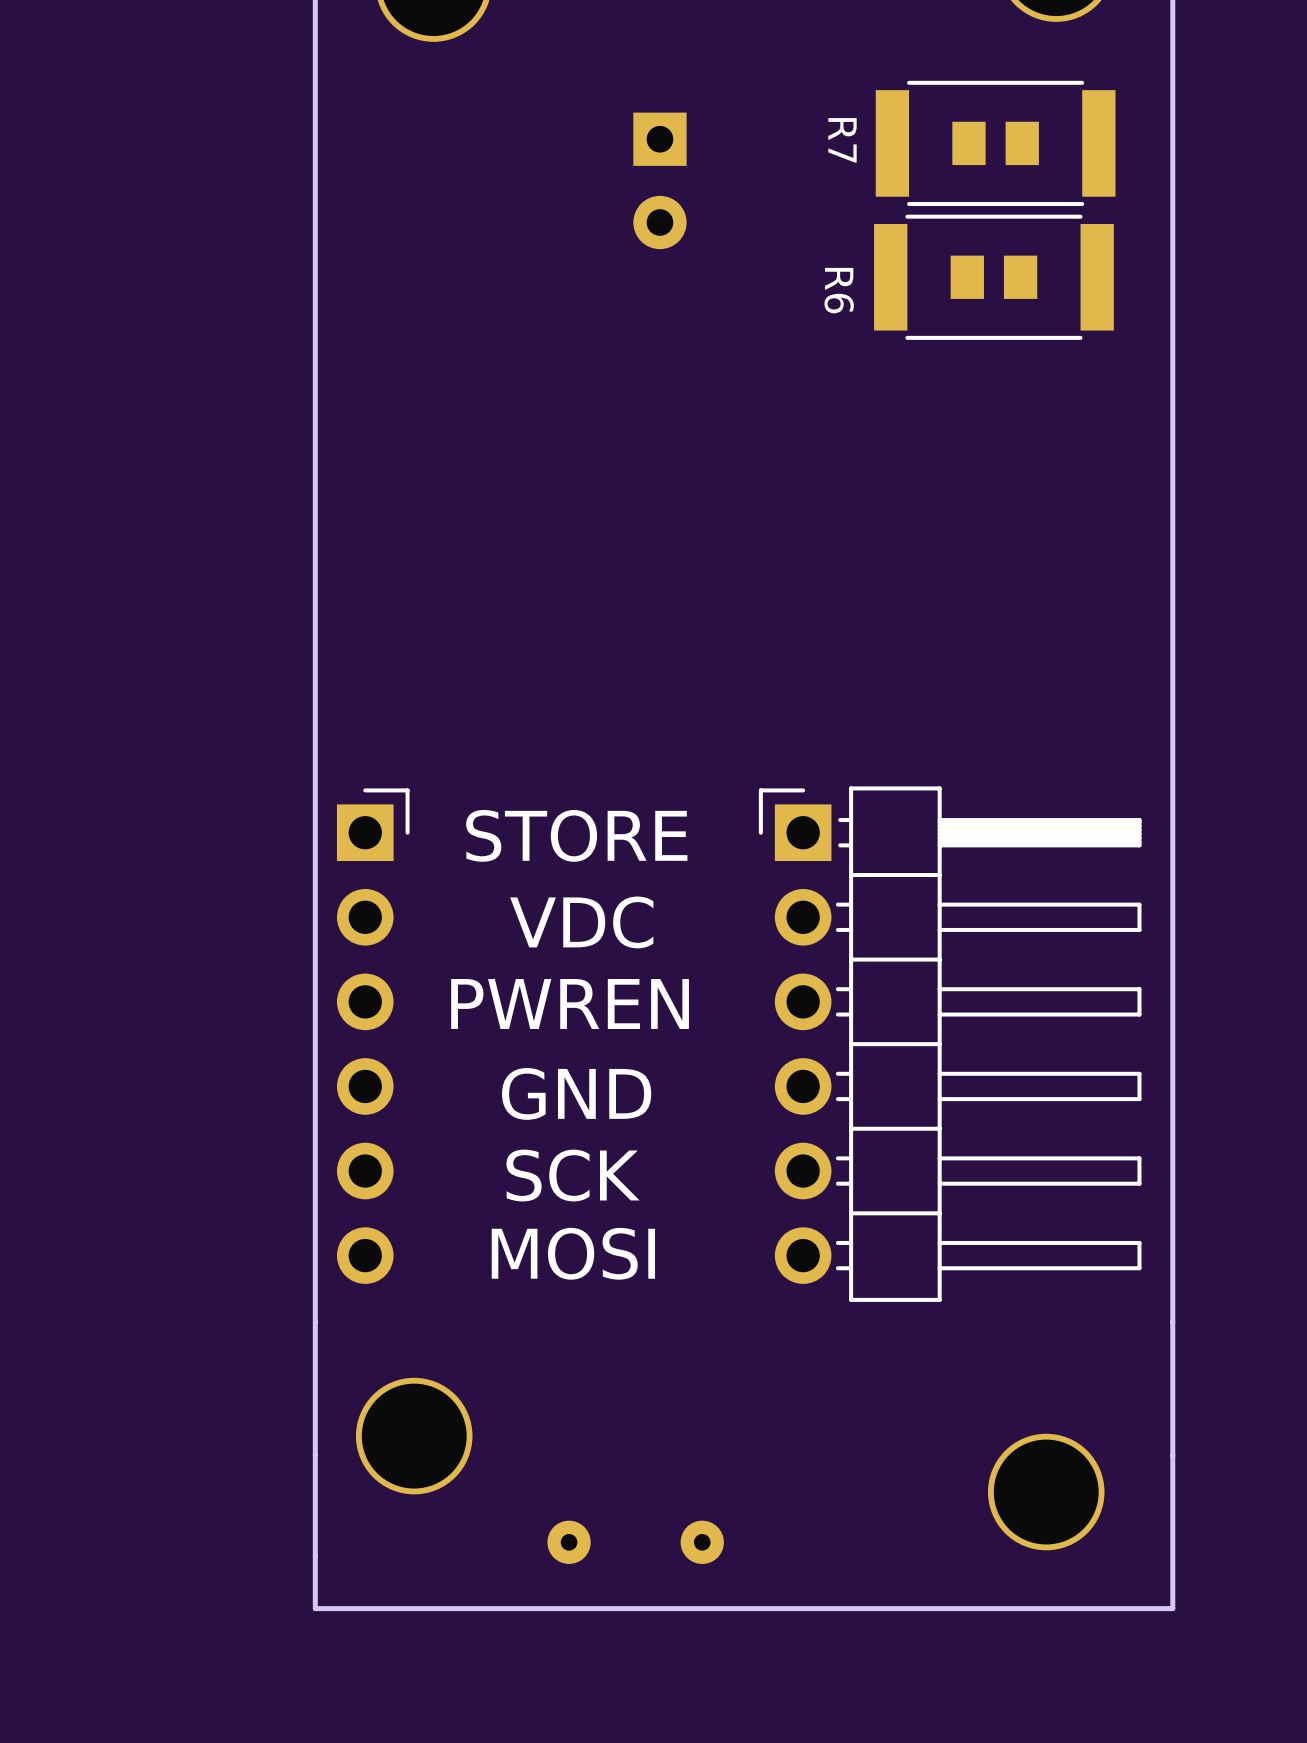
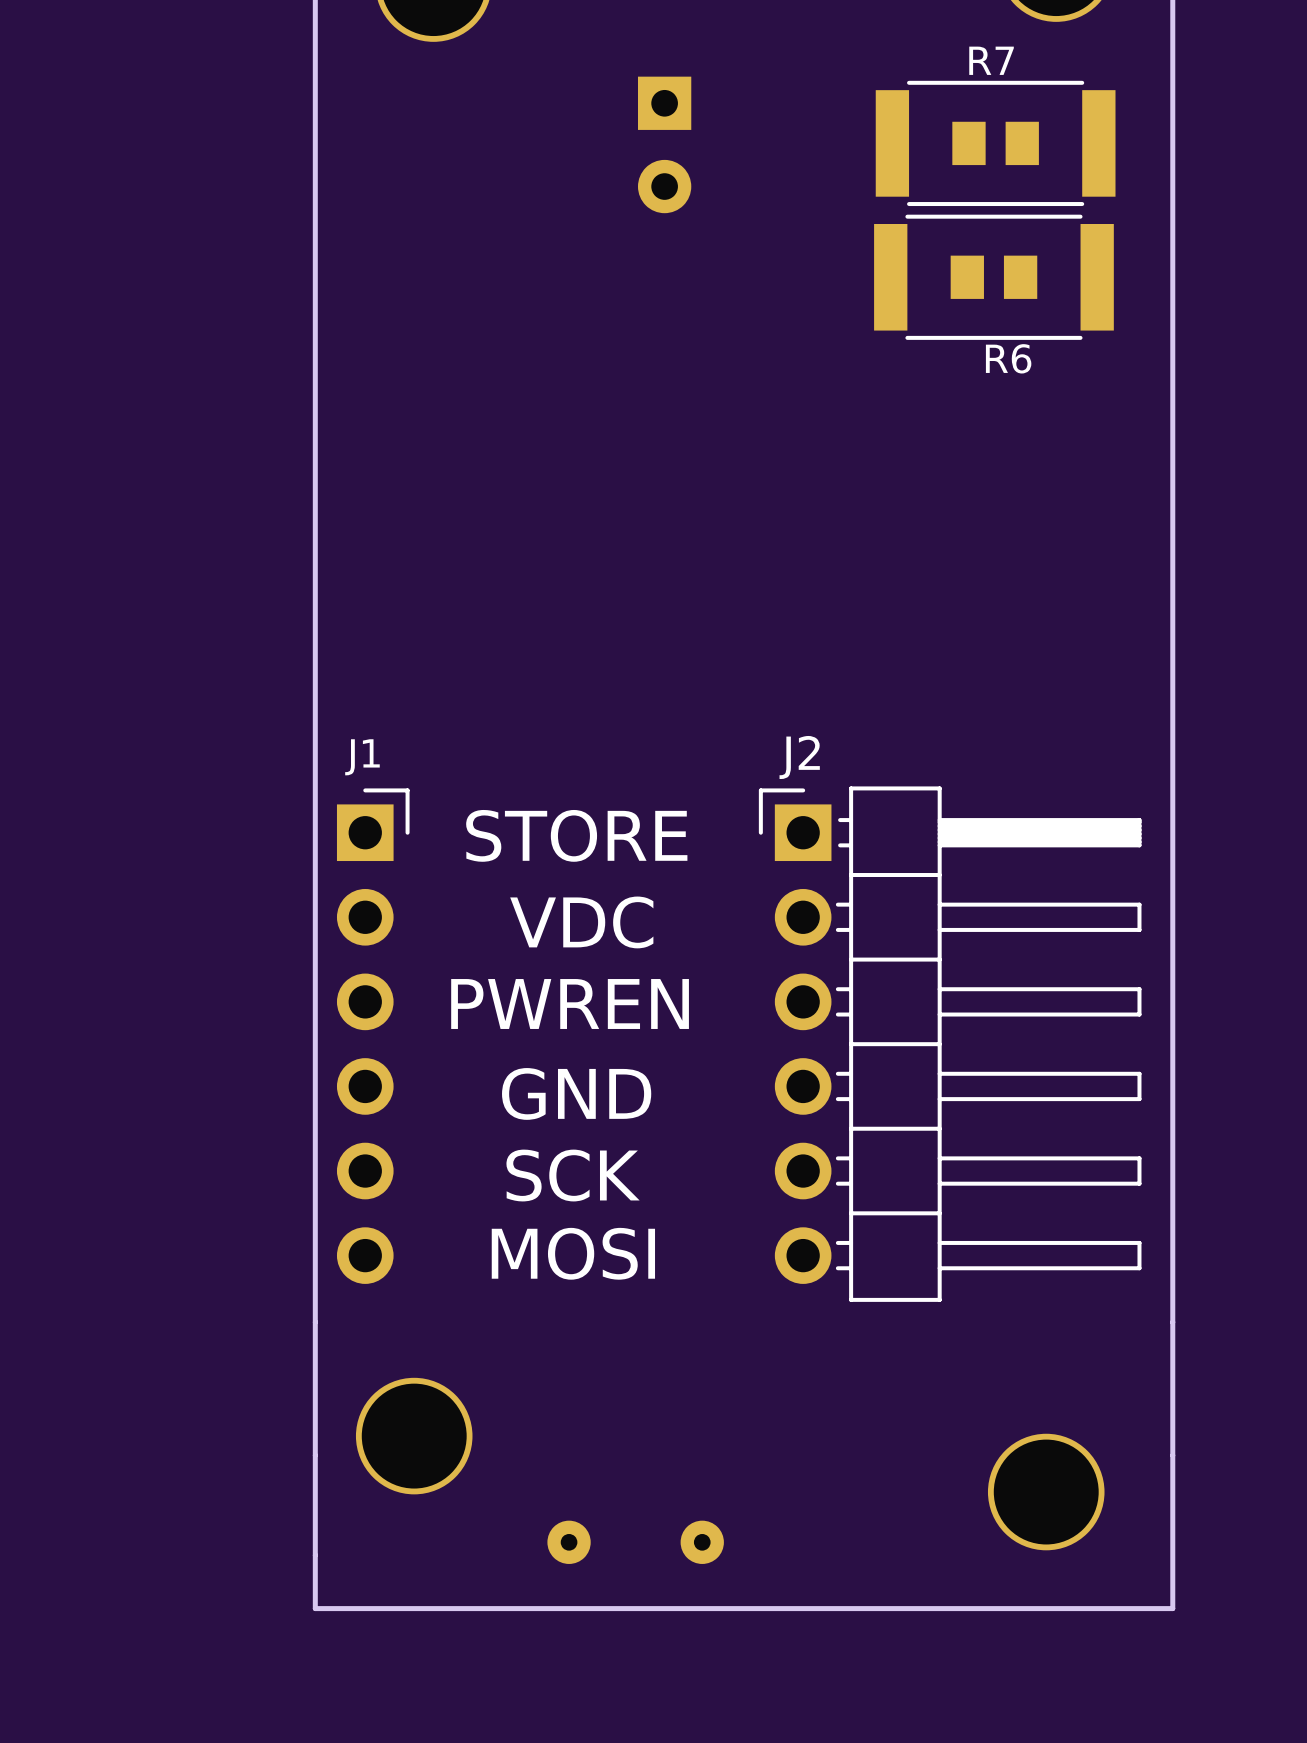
R7 name rotation: 0° (842, 140) -> 90° counterclockwise (991, 60)
R7 name position: R7 (842, 140) -> R7 (991, 60)
part position: (659, 180) -> (664, 144)
R6 name rotation: 0° (839, 290) -> 90° counterclockwise (1008, 358)
R6 name position: R6 (839, 290) -> R6 (1008, 358)
J1 name: none -> J1 (362, 757)
J2 name: none -> J2 (799, 757)

